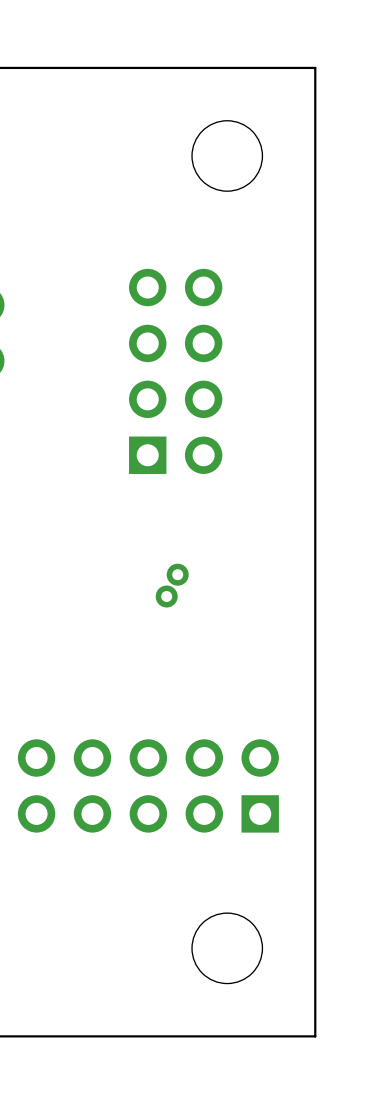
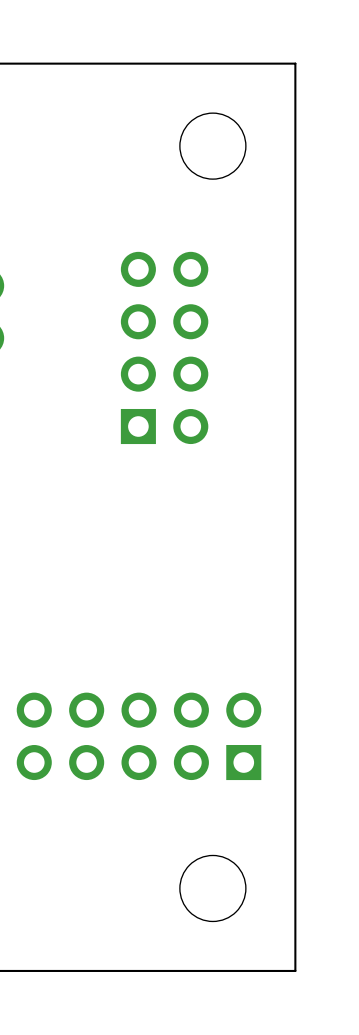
via: (177, 574) -> none
via: (166, 596) -> none

